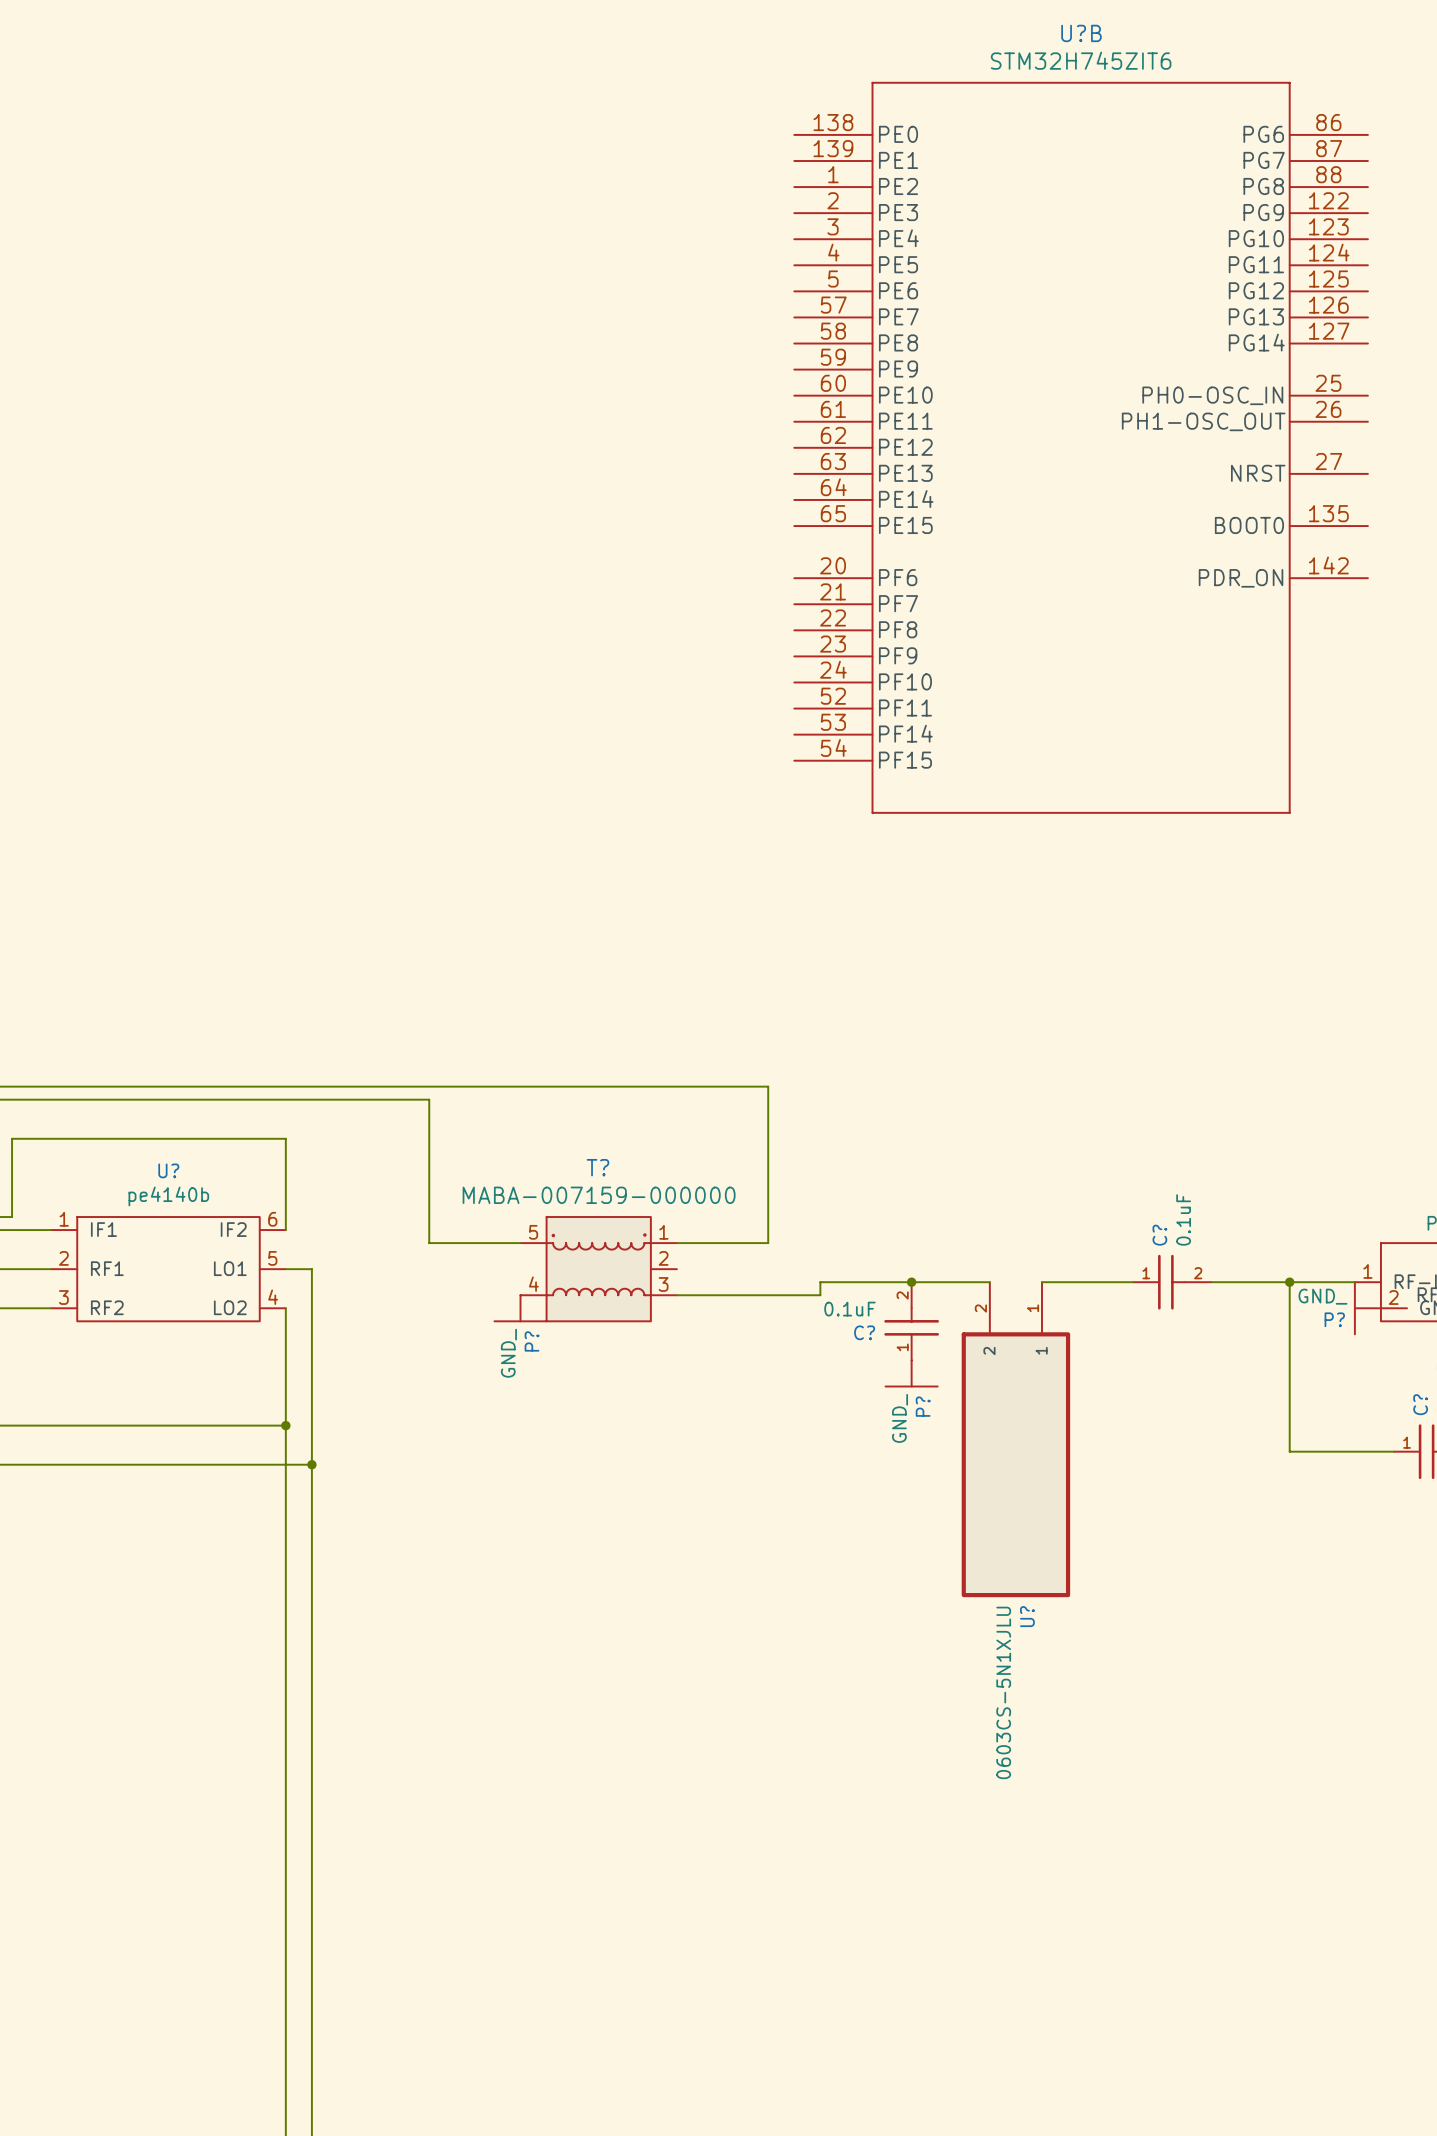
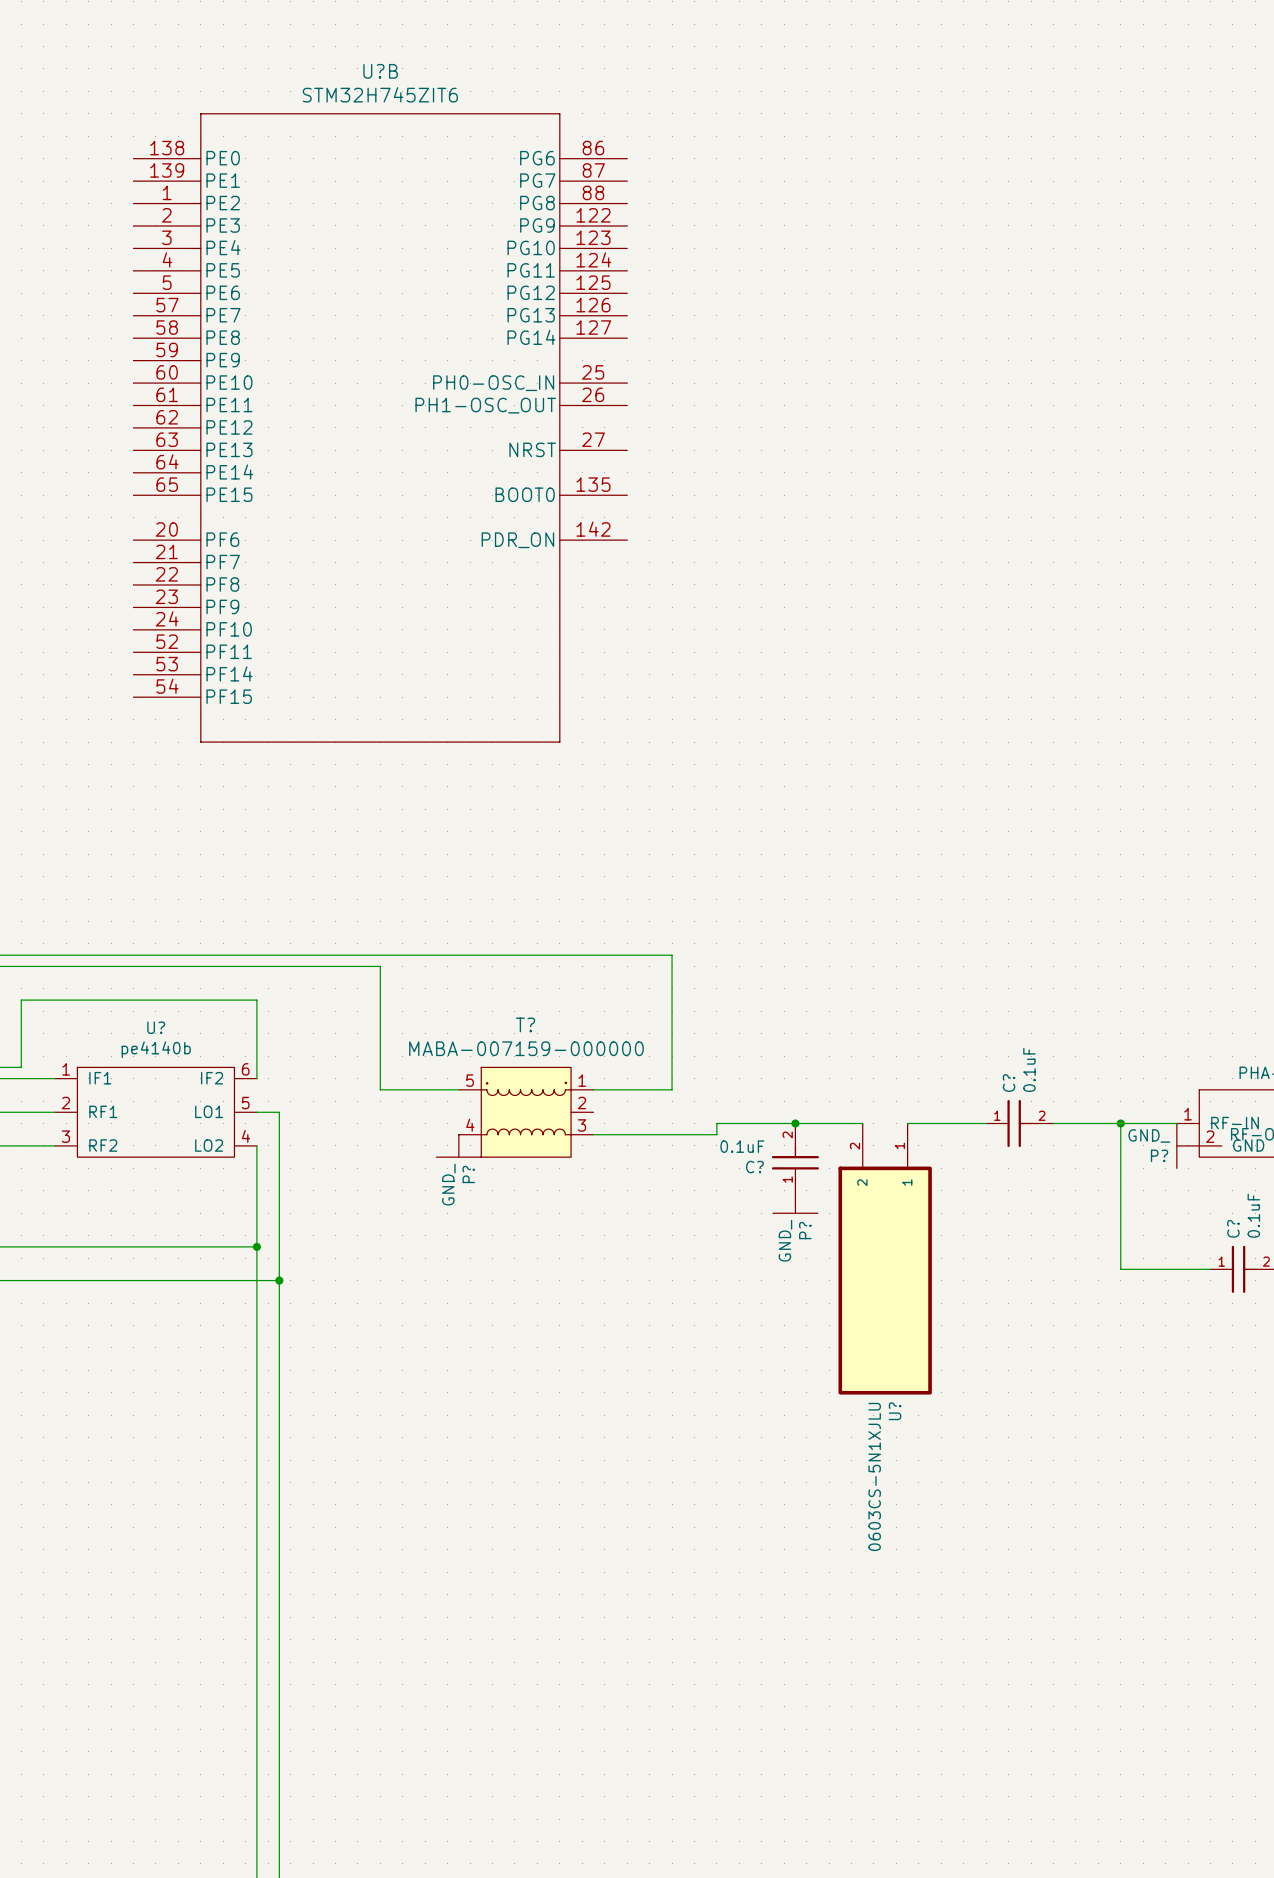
U?B: STM32H745ZIT6 (1081, 447) -> none
U?B: none -> STM32H745ZIT6 (380, 427)

